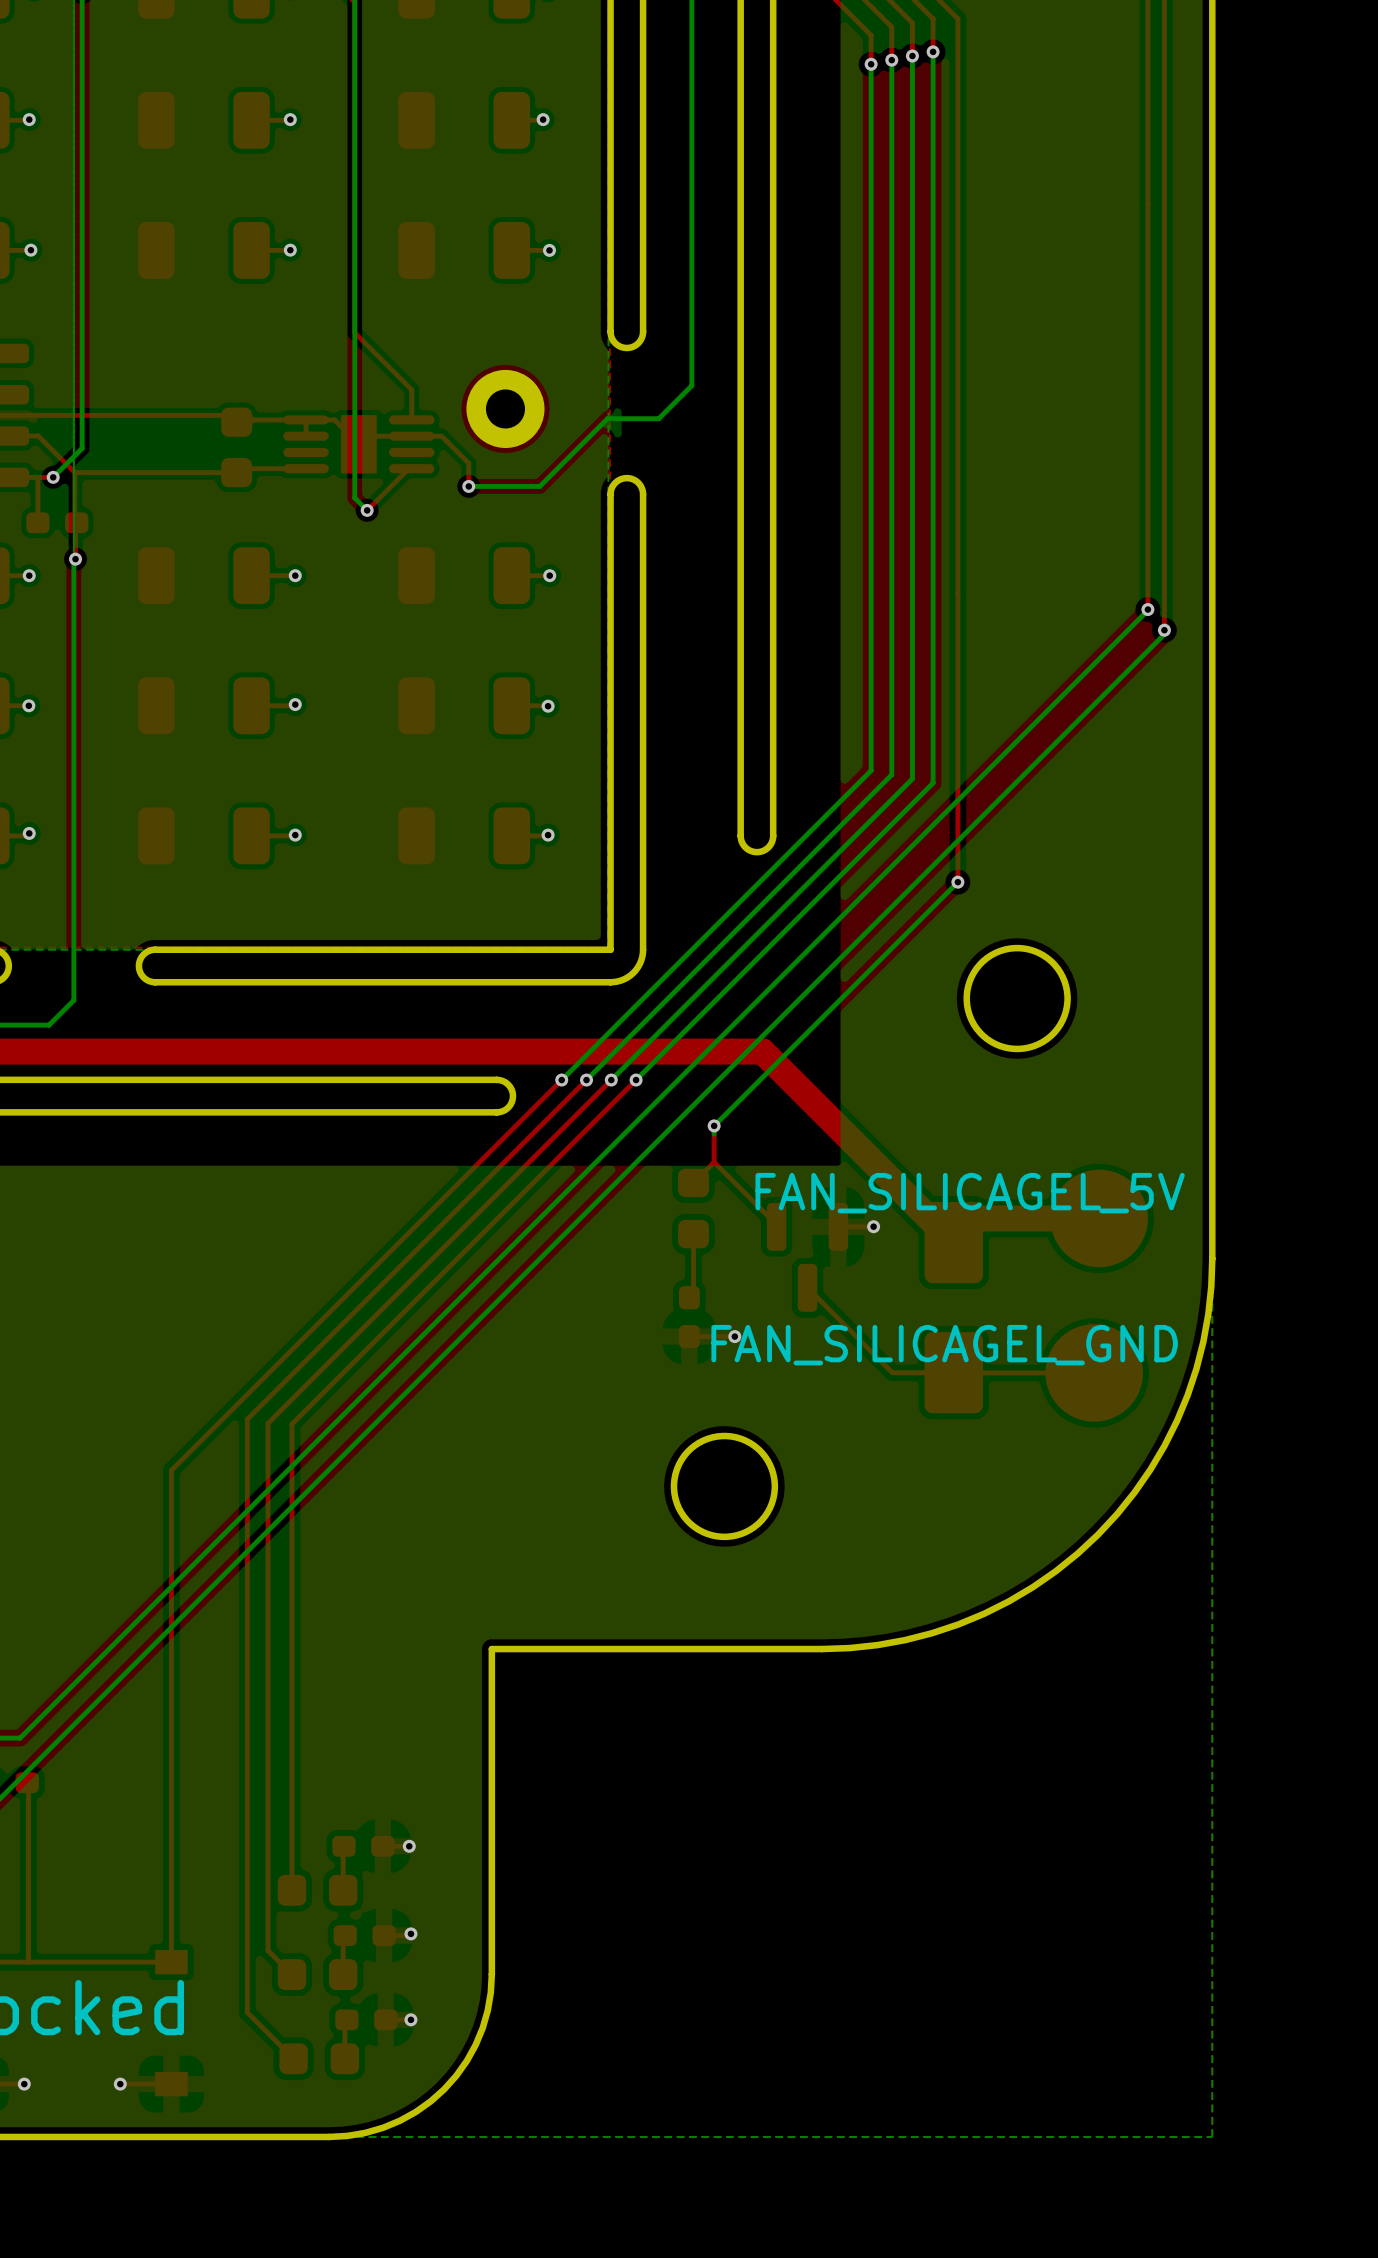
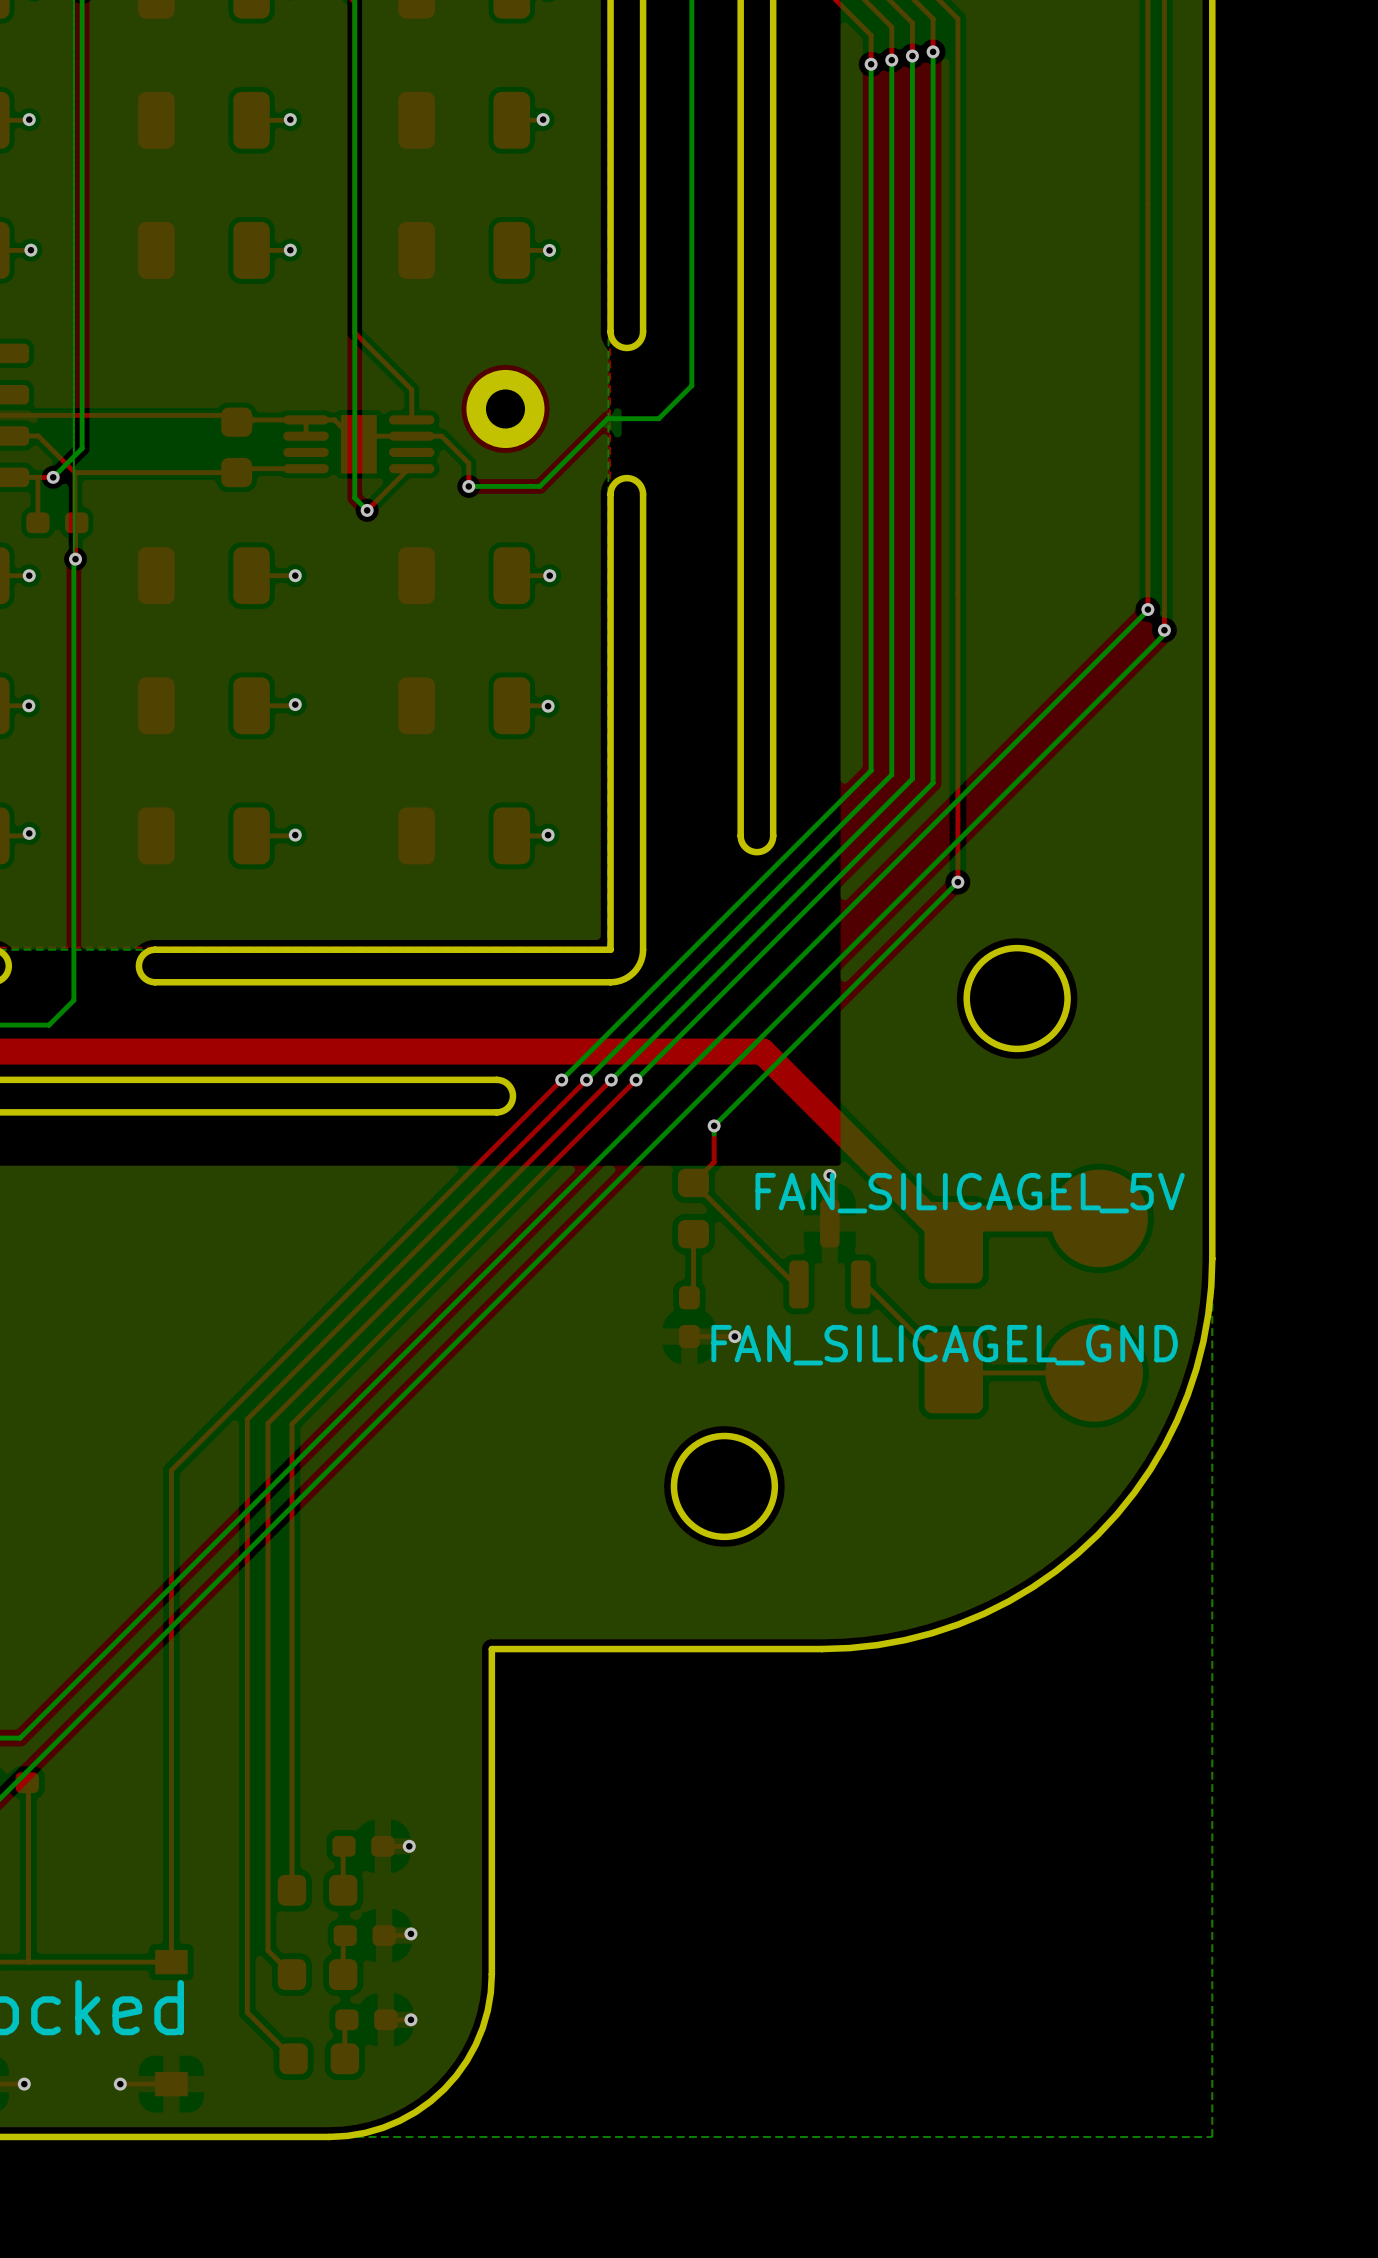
top track: (714, 1162) (776, 1226) -> none
top track: none -> (693, 1182) (795, 1284) (798, 1284)
via position: (873, 1226) -> (829, 1175)
part rotation: 0° (807, 1257) -> 180° (829, 1253)
top track: (807, 1287) (892, 1372) (953, 1372) -> (860, 1284) (865, 1284) (953, 1372)

